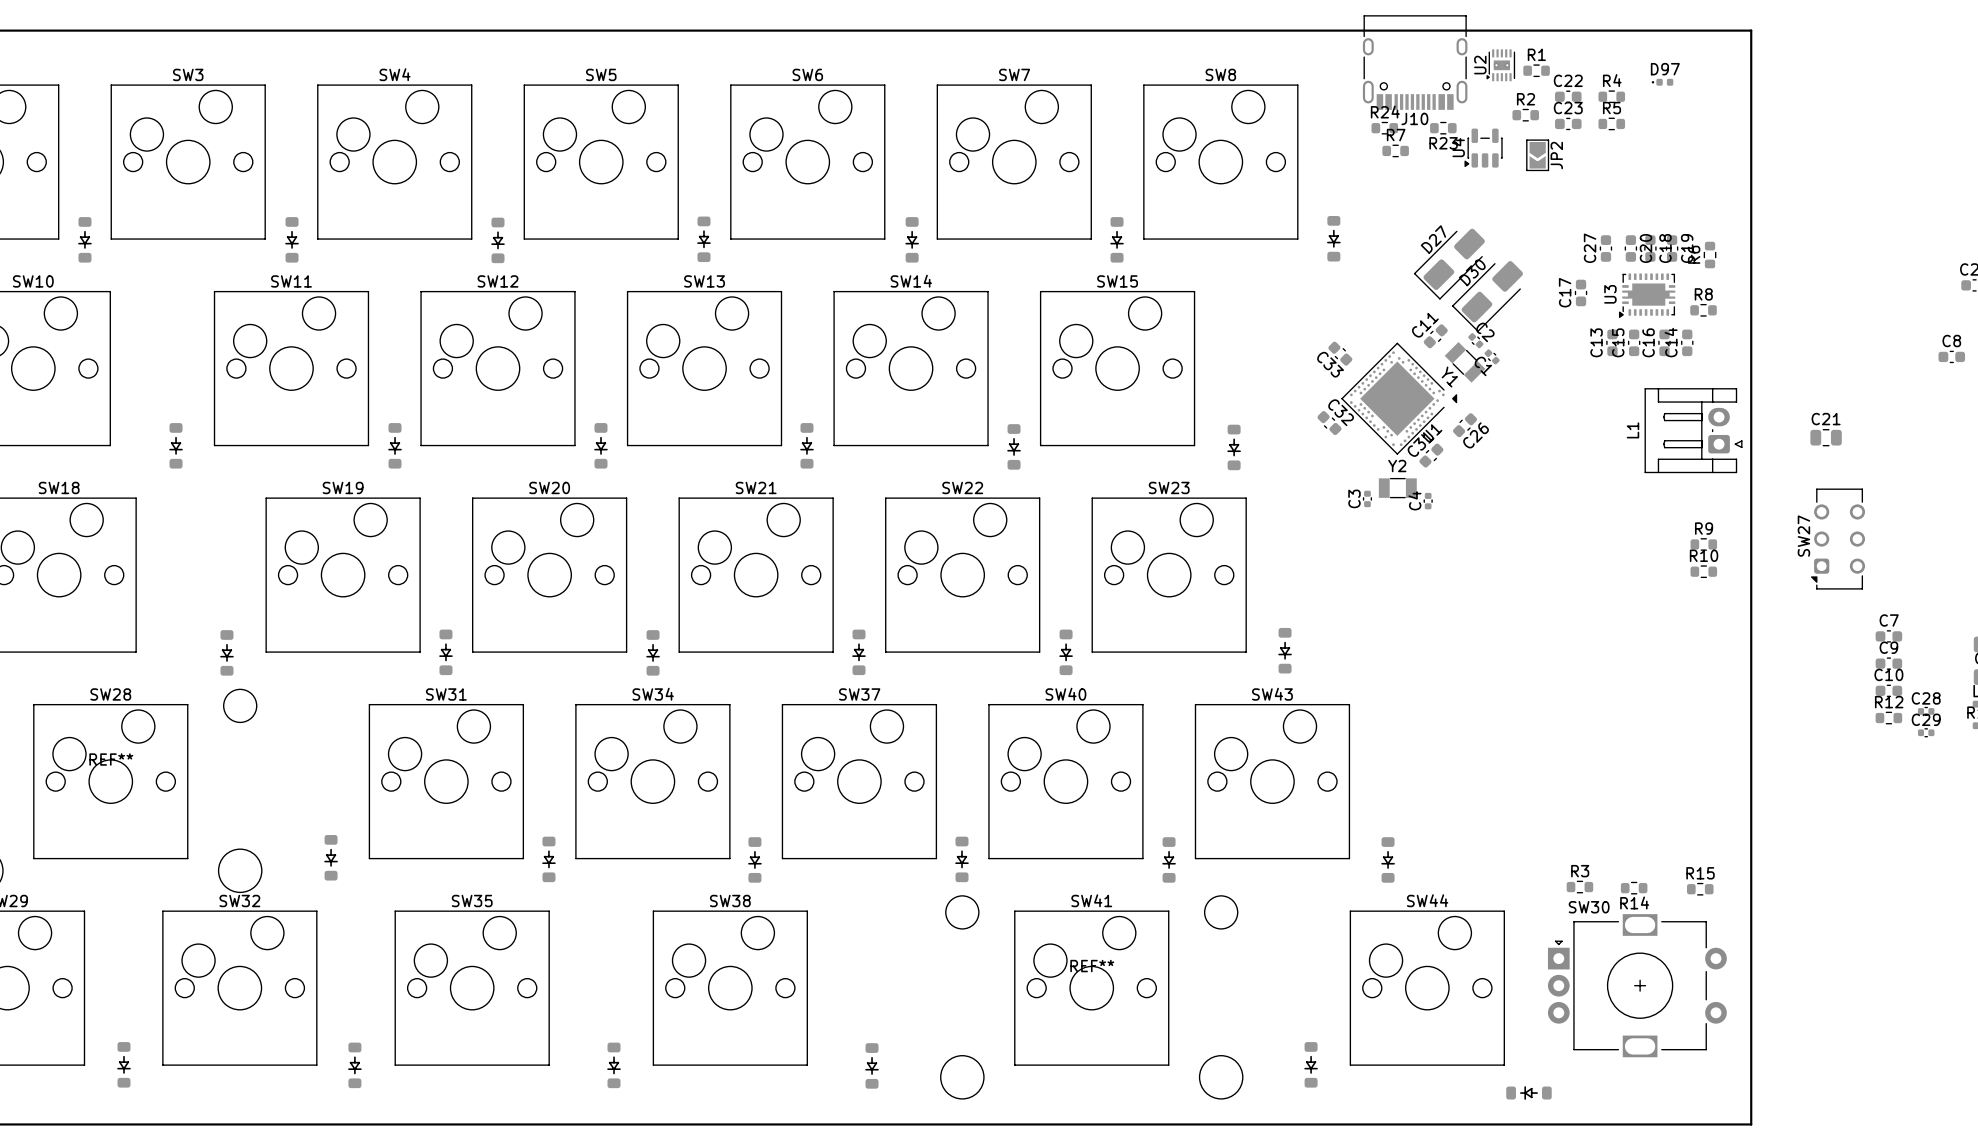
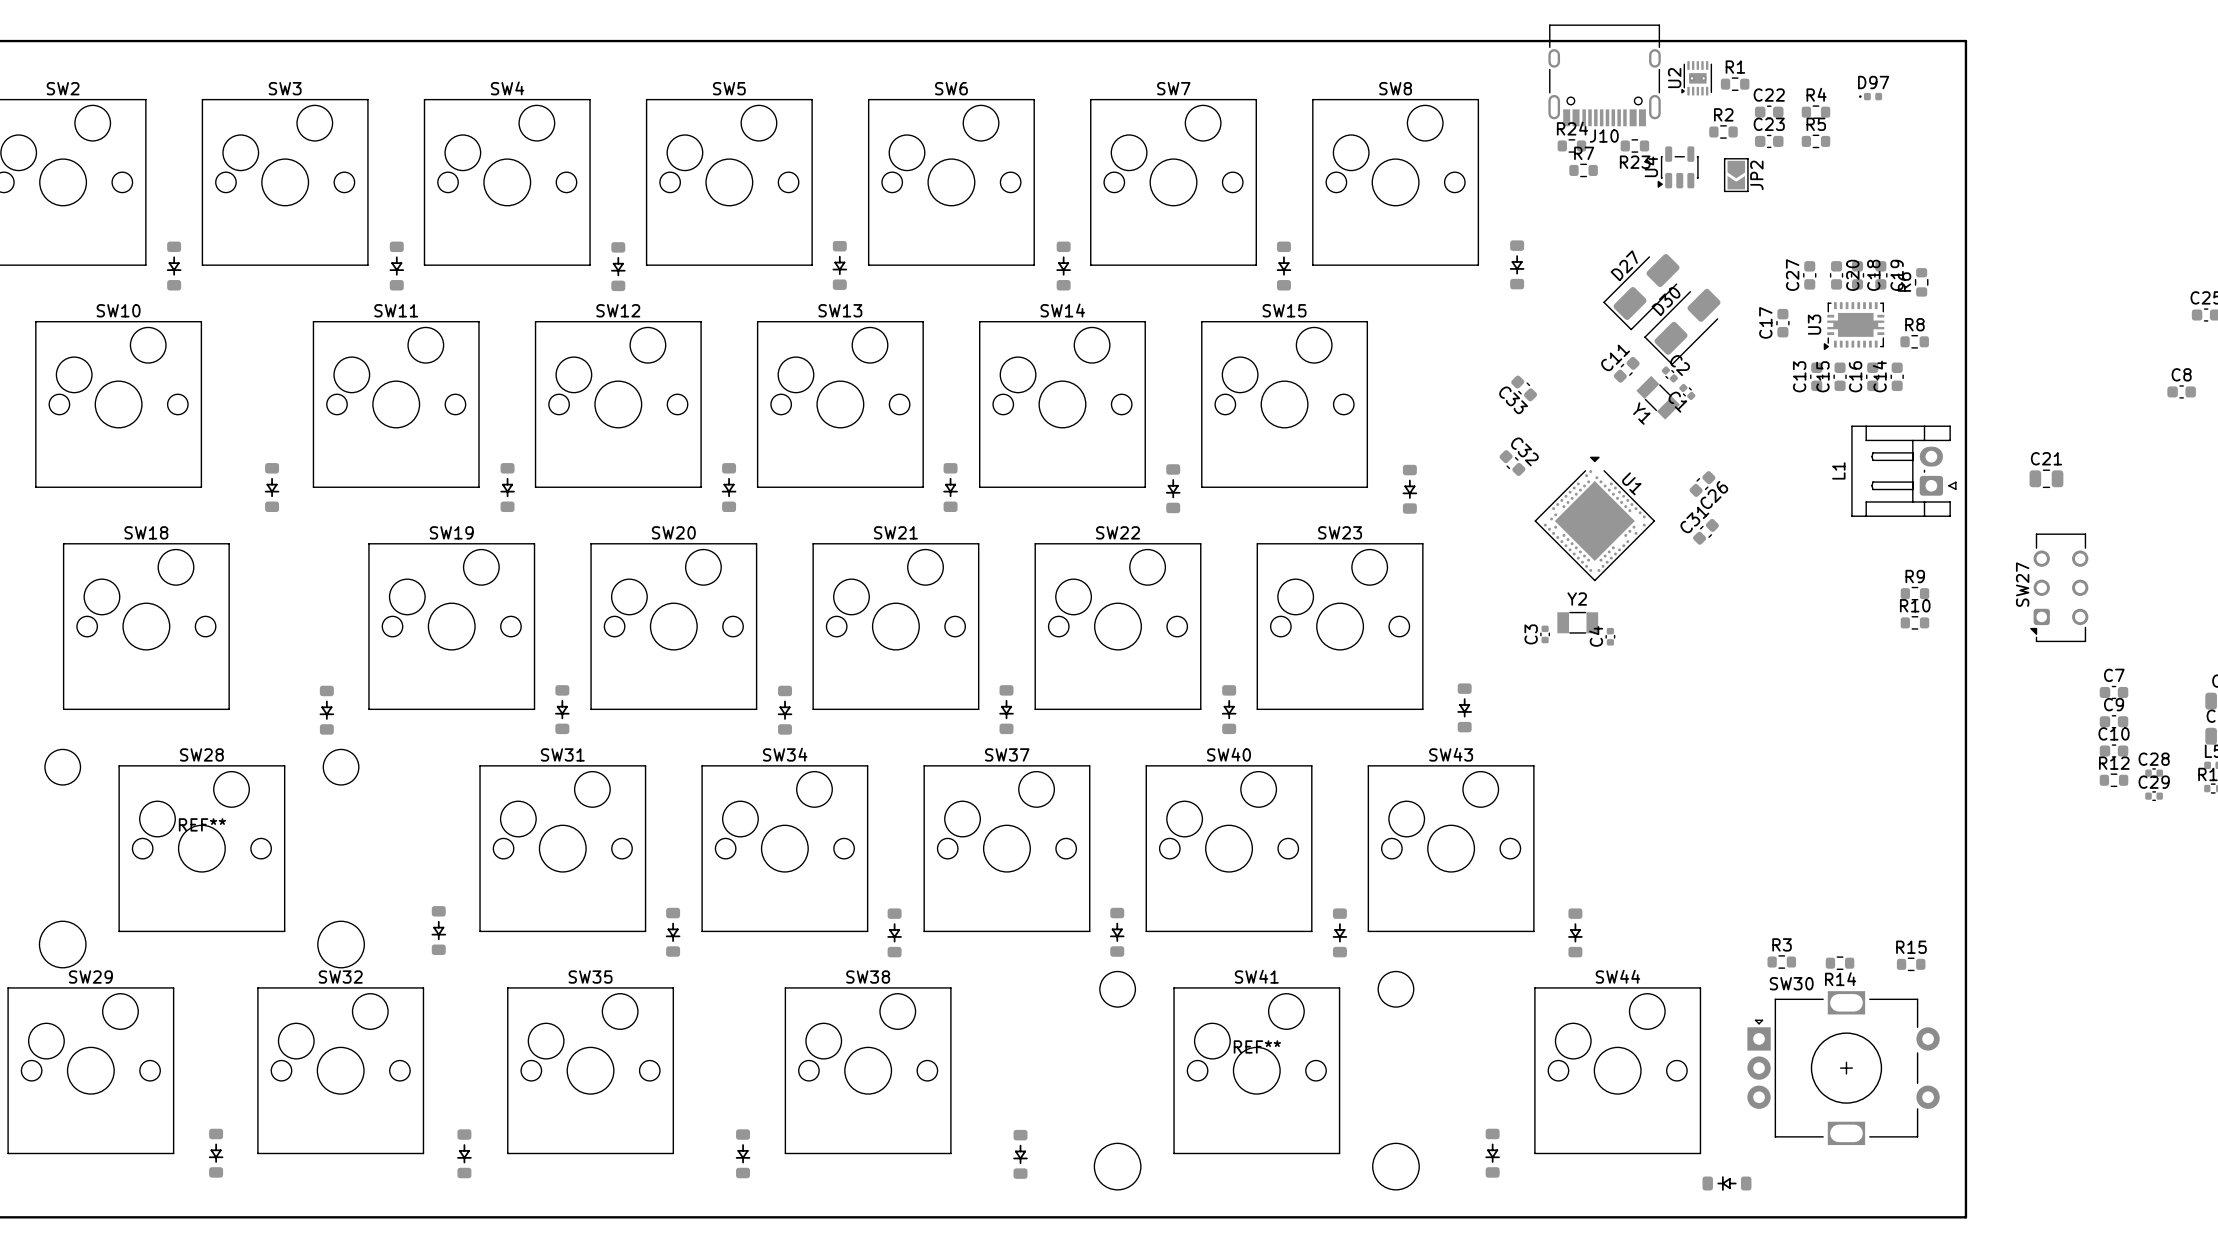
U1 rotation: 0° (1399, 398) -> 90° counterclockwise (1594, 518)
U1 position: (1399, 398) -> (1594, 518)
C26 position: (1465, 425) -> (1702, 484)
C31 position: (1431, 455) -> (1705, 531)
Y2 position: (1397, 488) -> (1577, 622)
C3 position: (1367, 498) -> (1545, 634)
C4 position: (1428, 501) -> (1610, 636)

